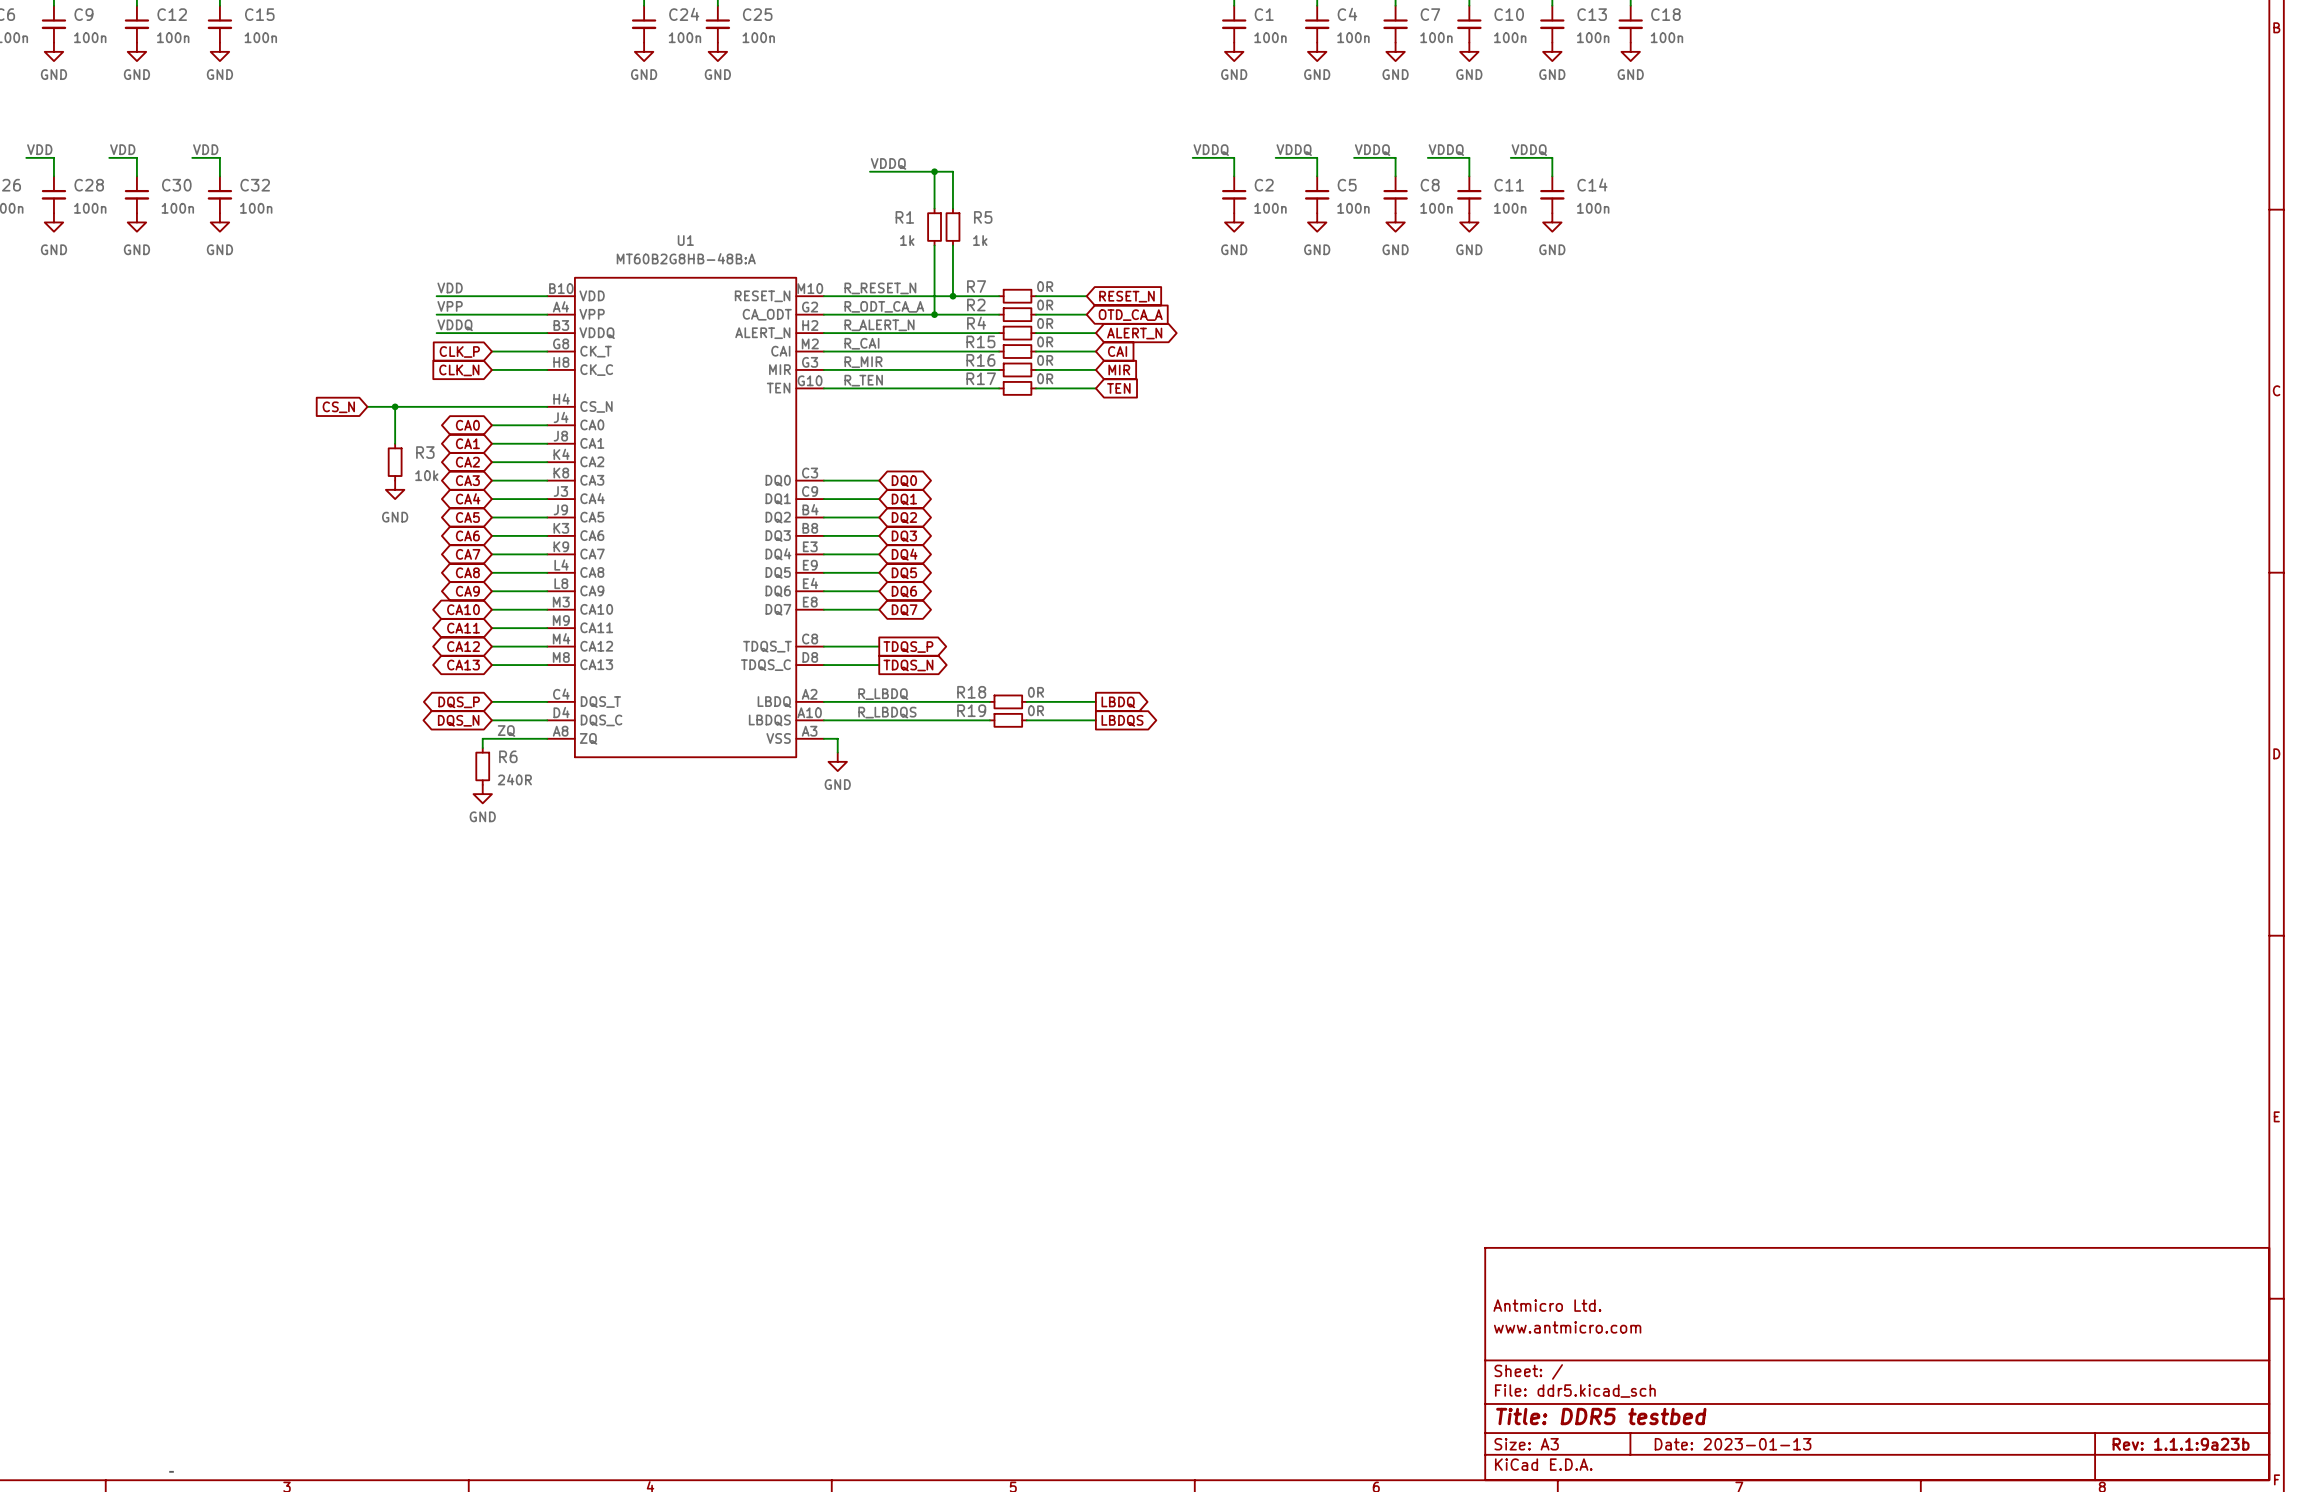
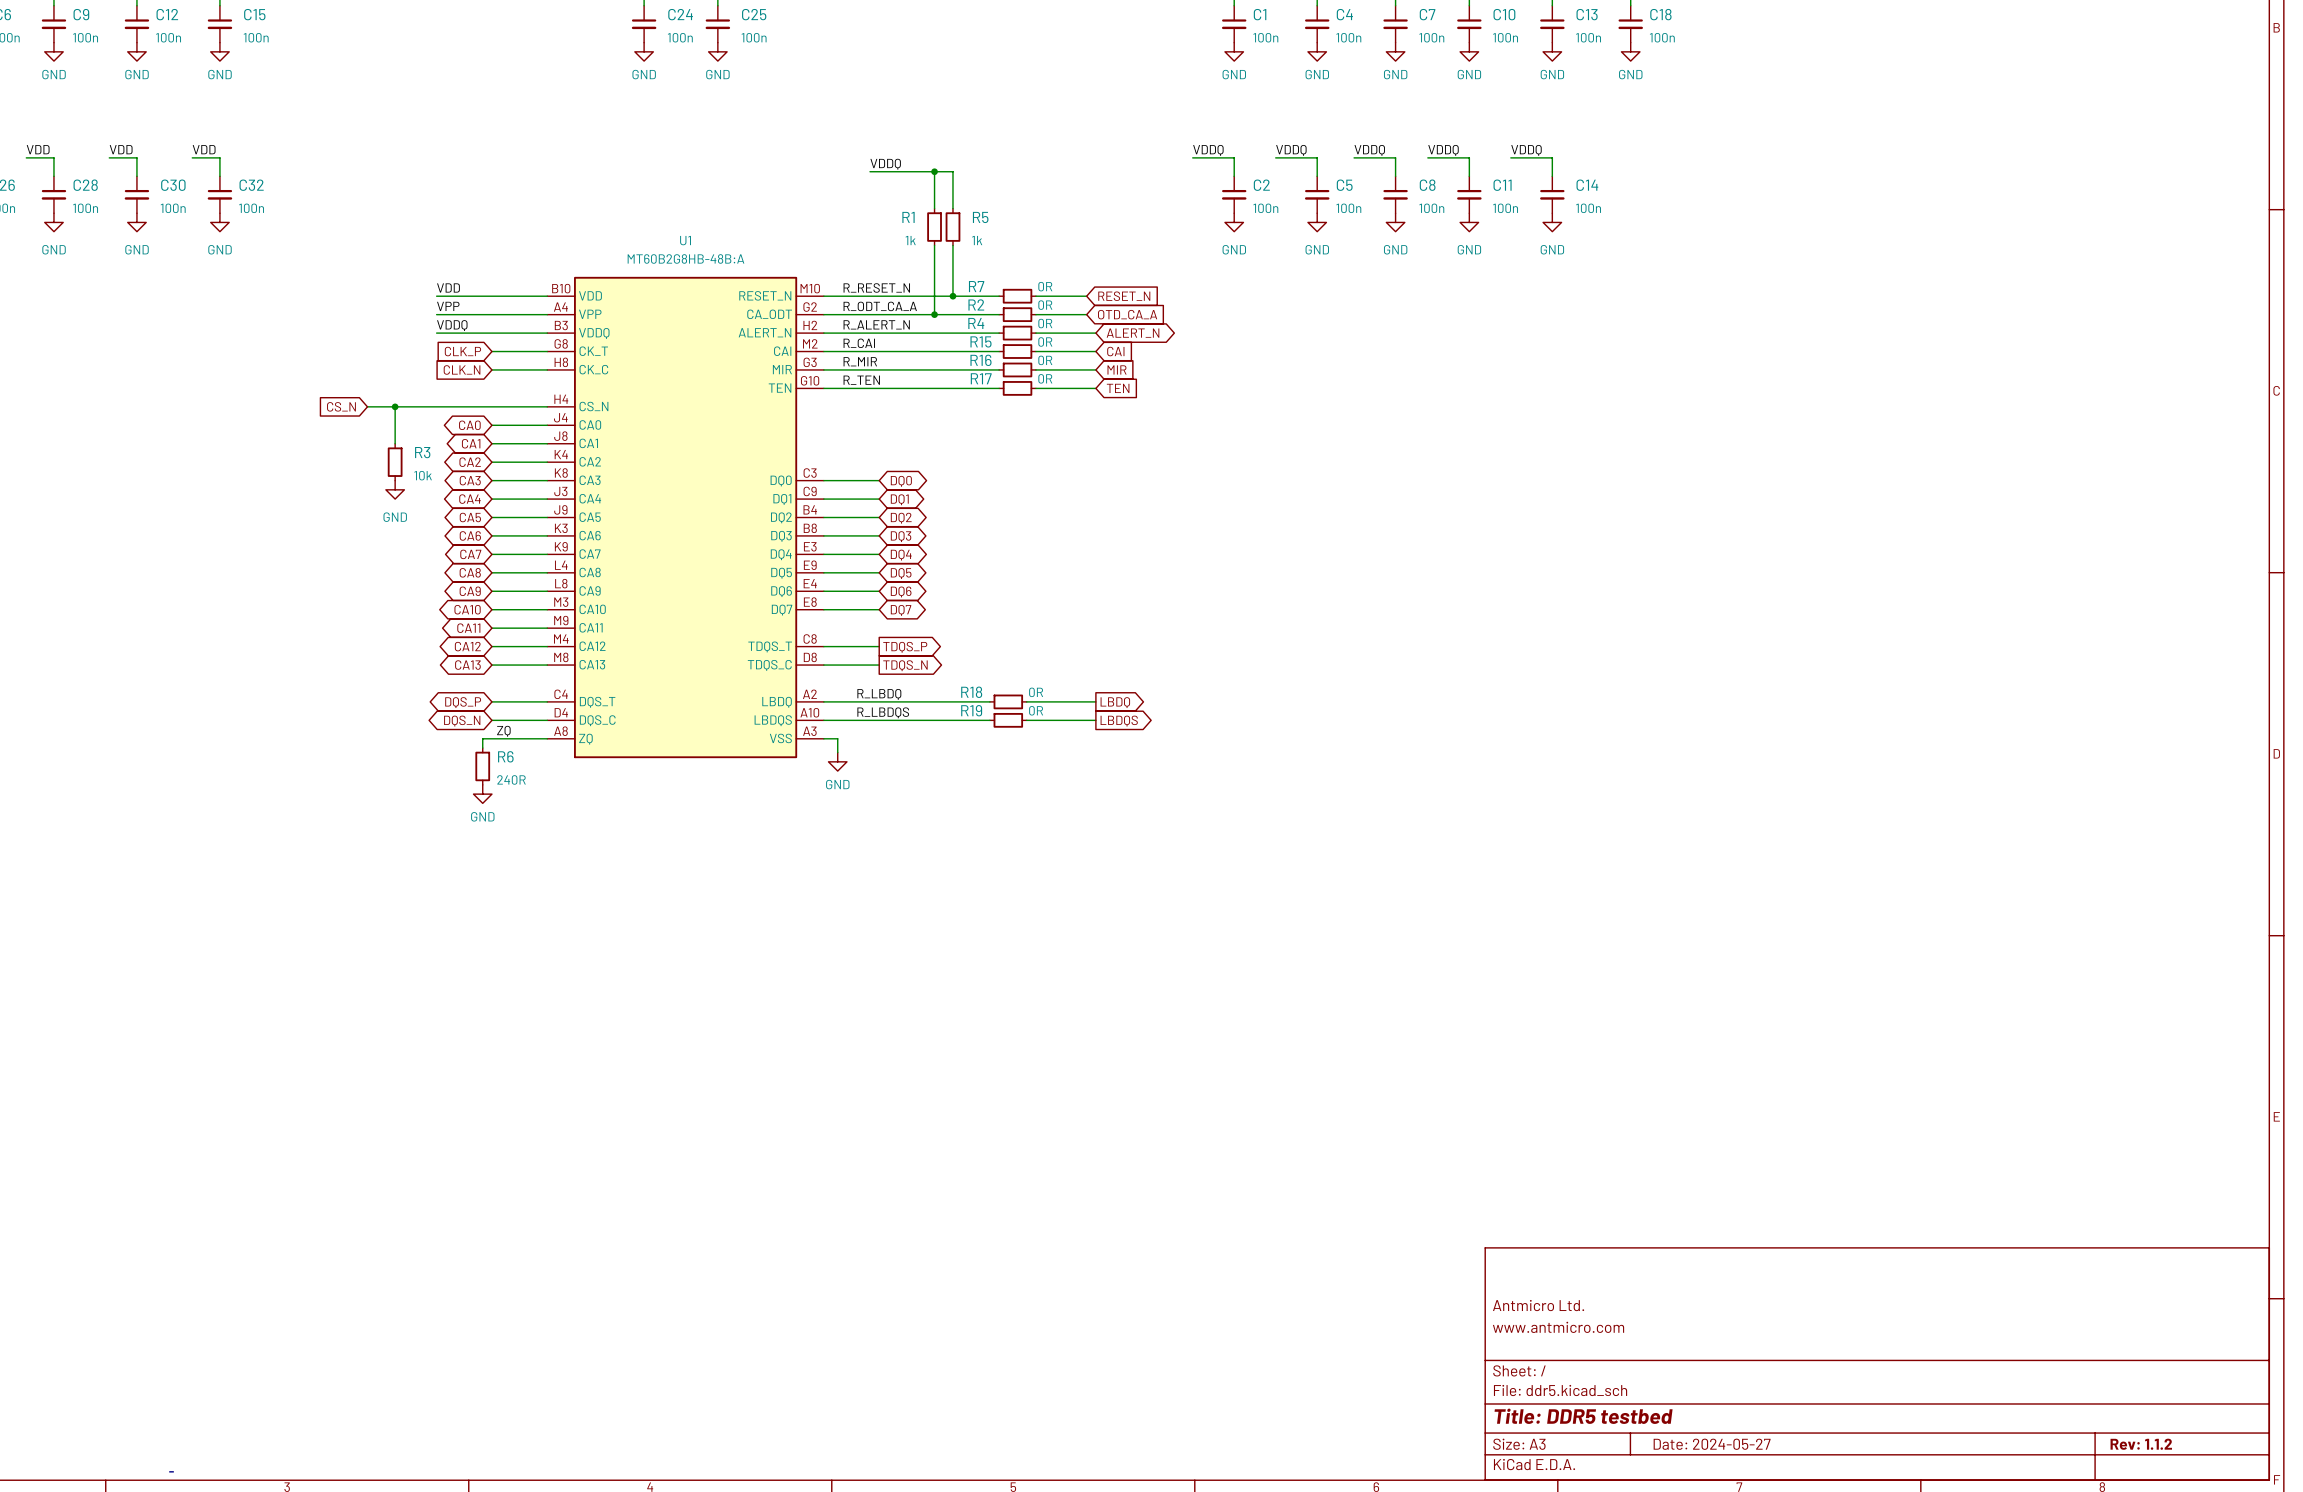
title block: Date: 2023-01-13 (1733, 1444) -> Date: 2024-05-27 (1712, 1444)
title block: Rev: 1.1.1:9a23b (2181, 1444) -> Rev: 1.1.2 (2141, 1444)

